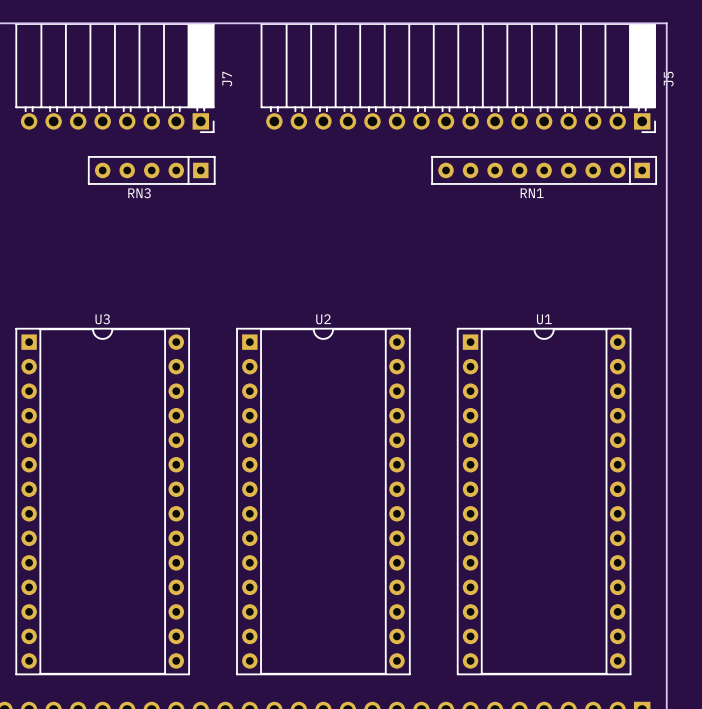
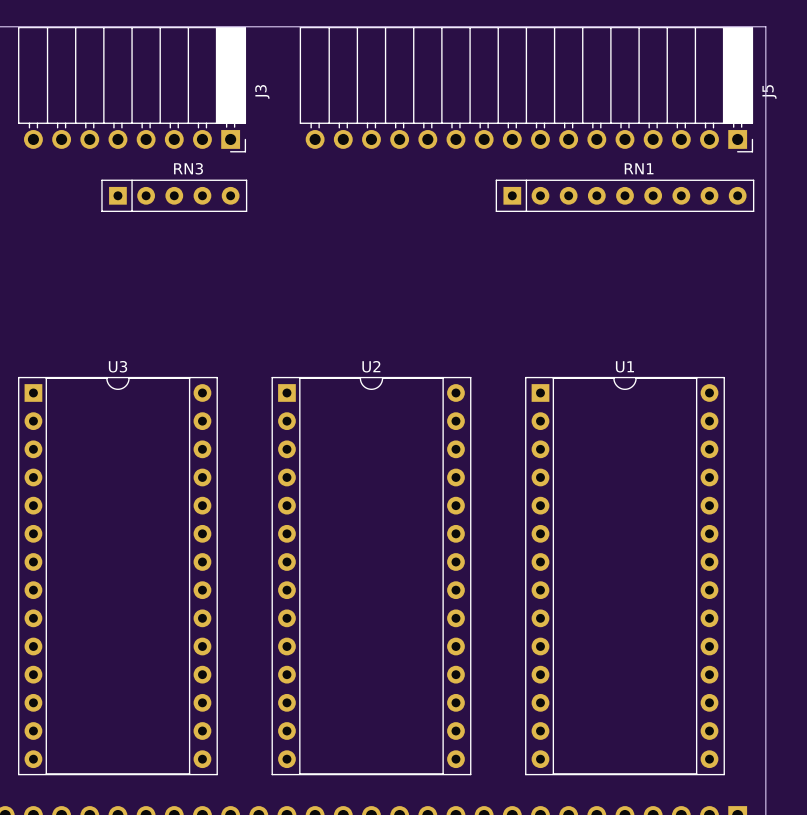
J7 name: J7 (227, 79) -> J3 (262, 91)
RN3 rotation: 0° (151, 170) -> 180° (174, 195)
RN1 rotation: 0° (544, 170) -> 180° (624, 195)

